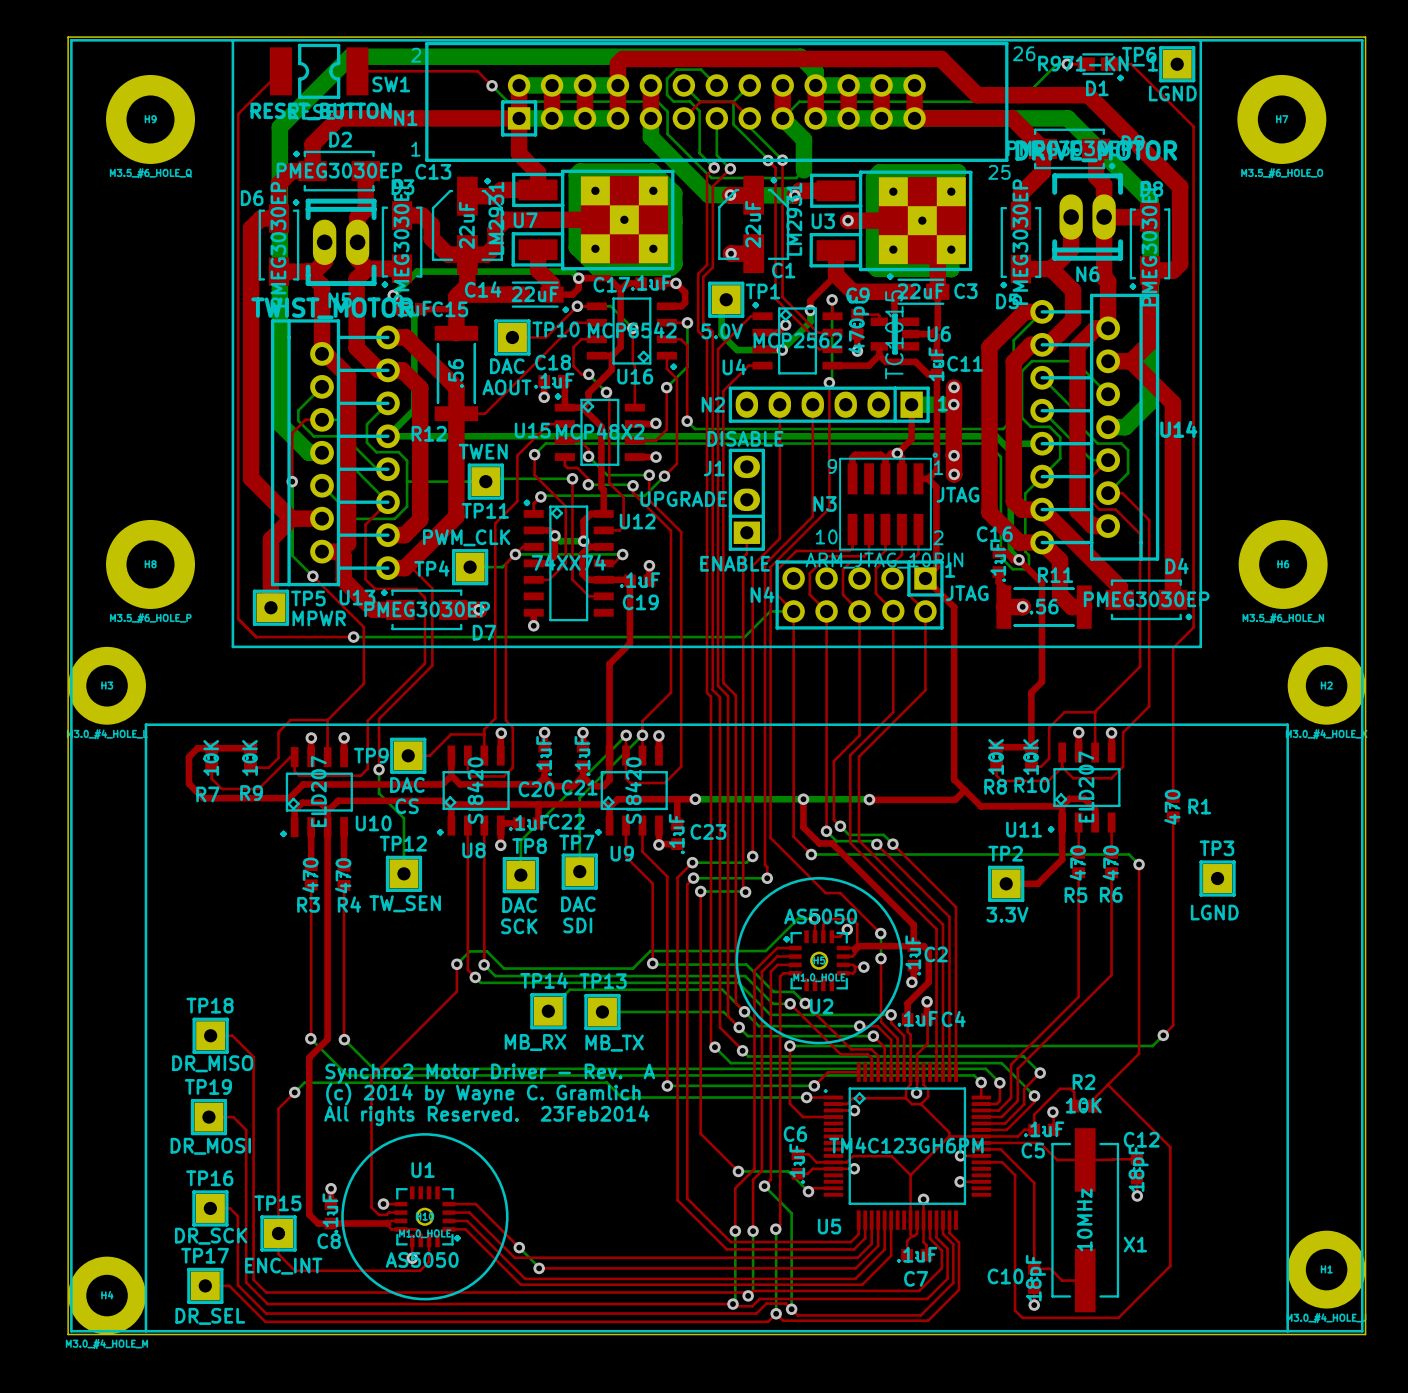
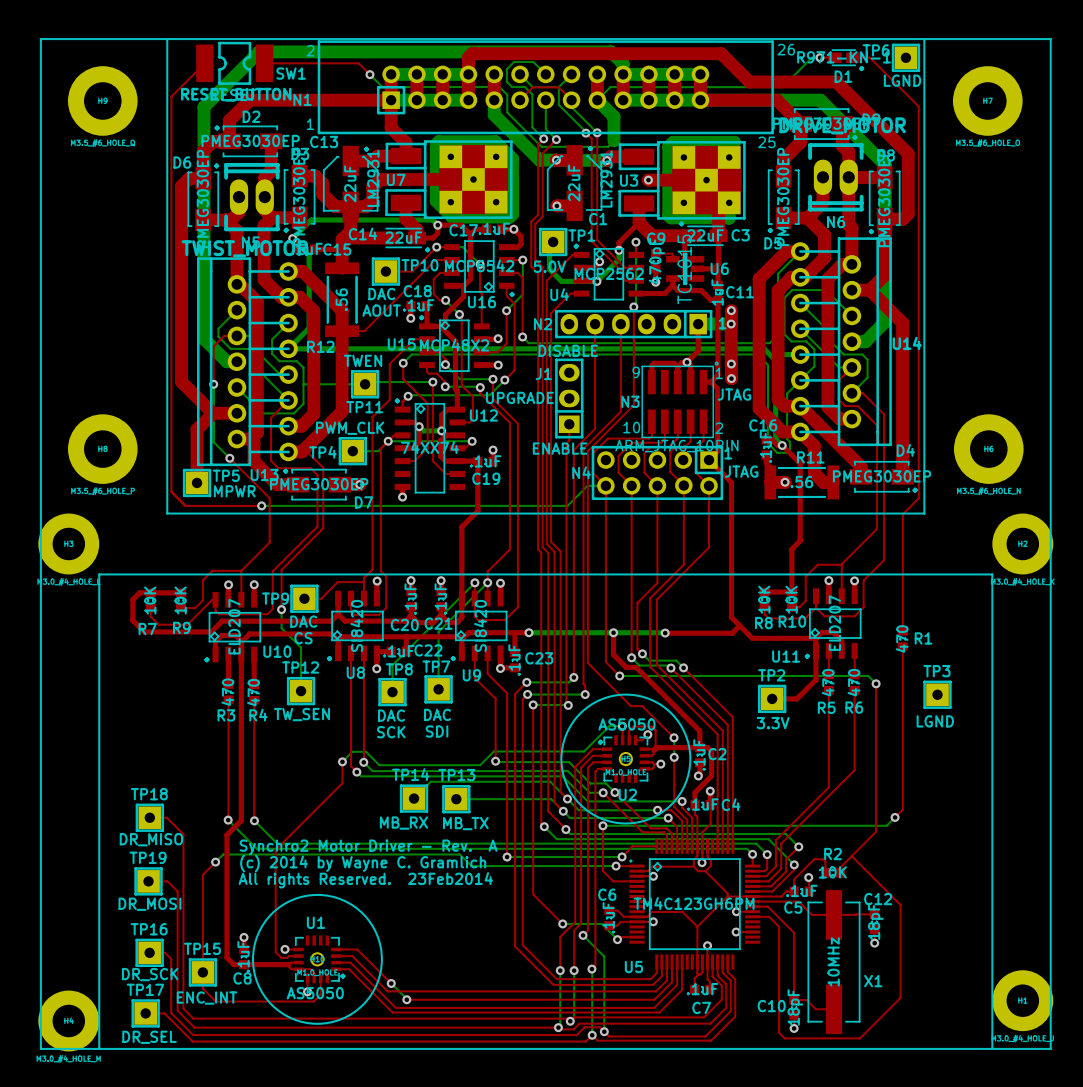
board edge: (68, 37) (68, 1334) (1365, 1334) (1365, 37) (68, 37) -> none

